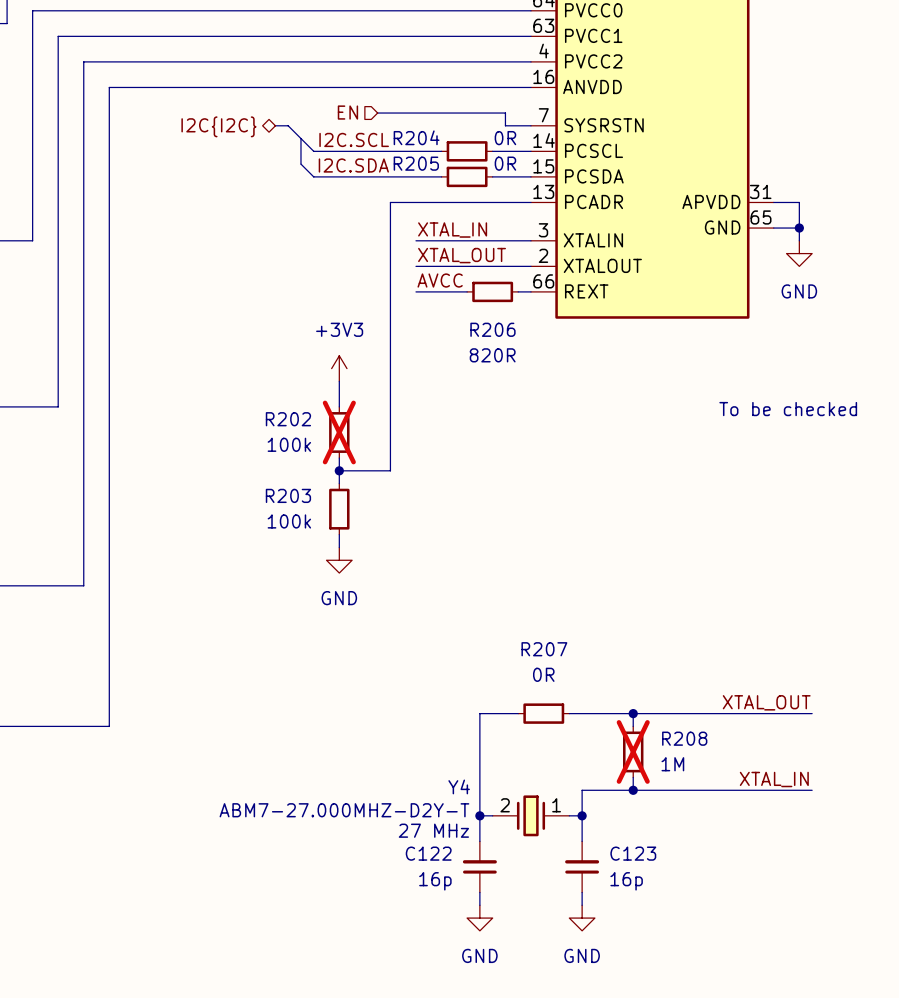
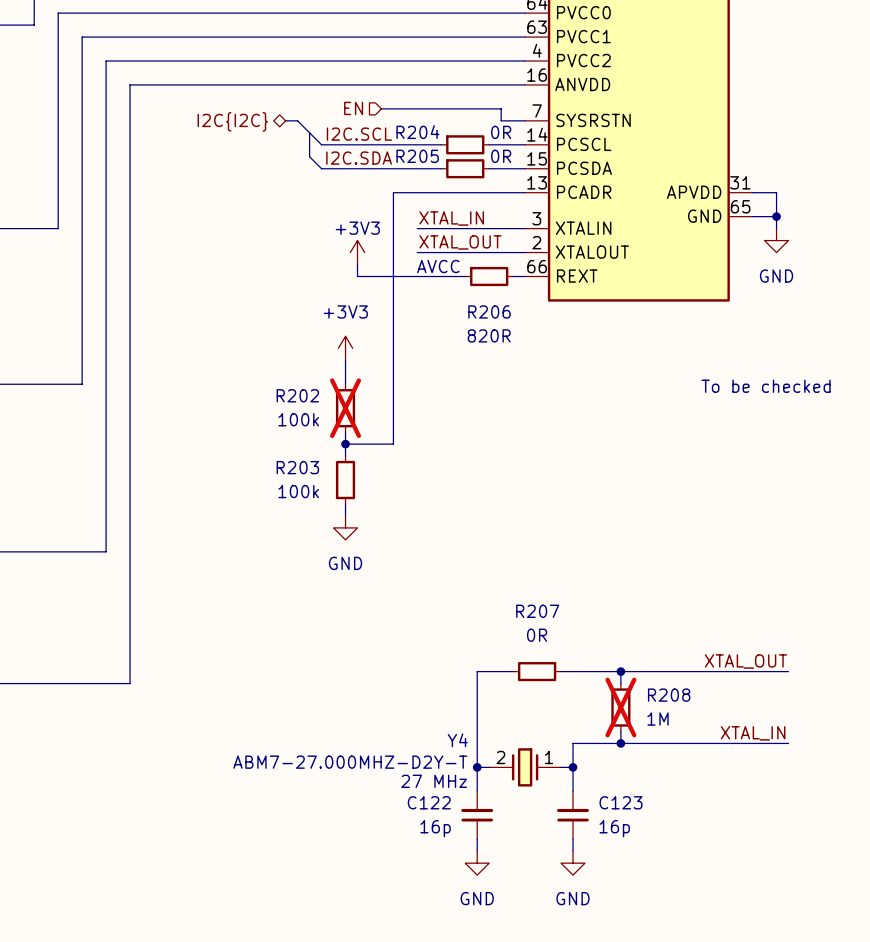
power symbol: none -> +3V3 (357, 252)
wire: none -> (357, 264) (357, 276) (417, 276)
label: AVCC (440, 280) -> none
text: none -> AVCC (438, 266)

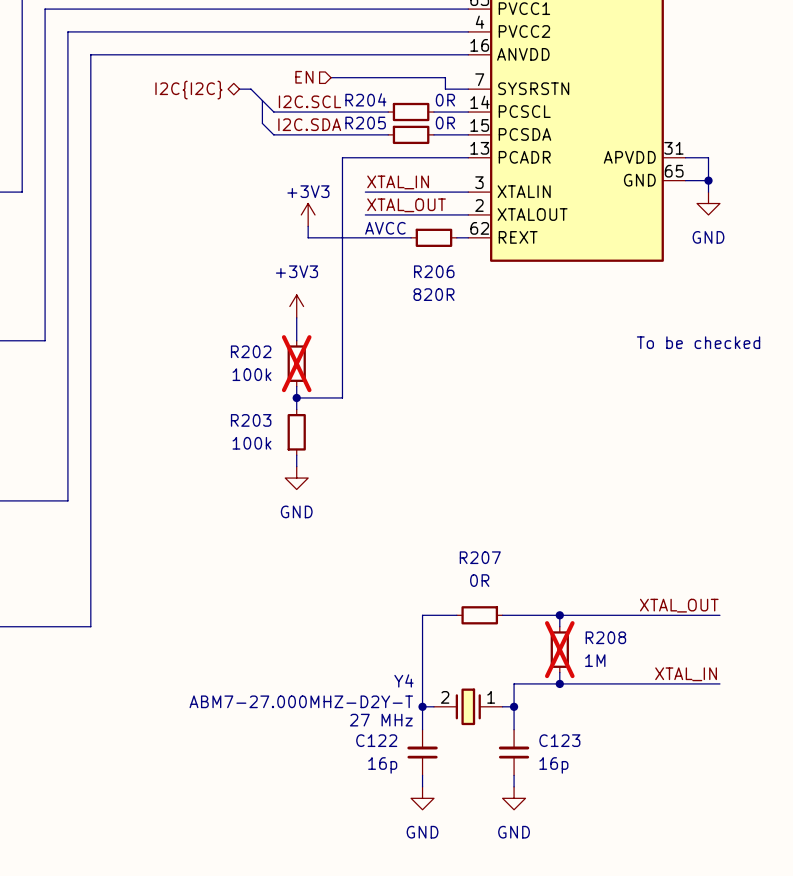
part pin number: 66 (537, 266) -> 62 (479, 228)

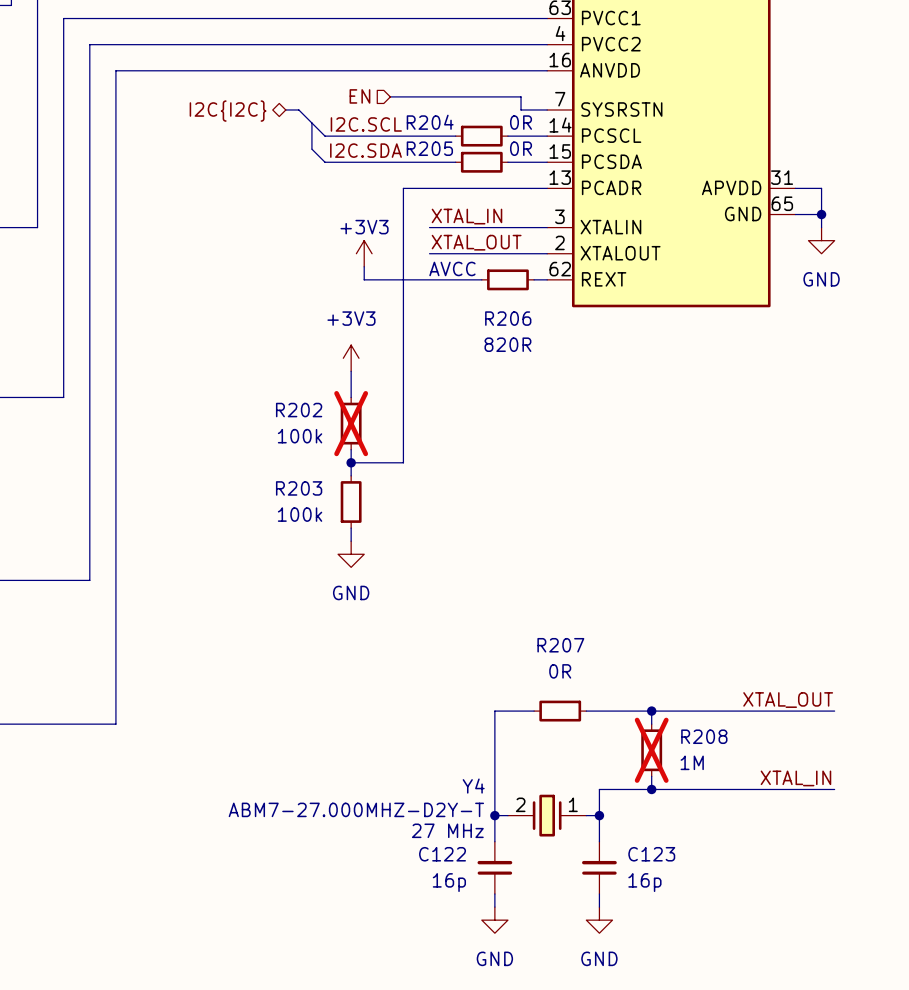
text: To be checked (698, 342) -> none

